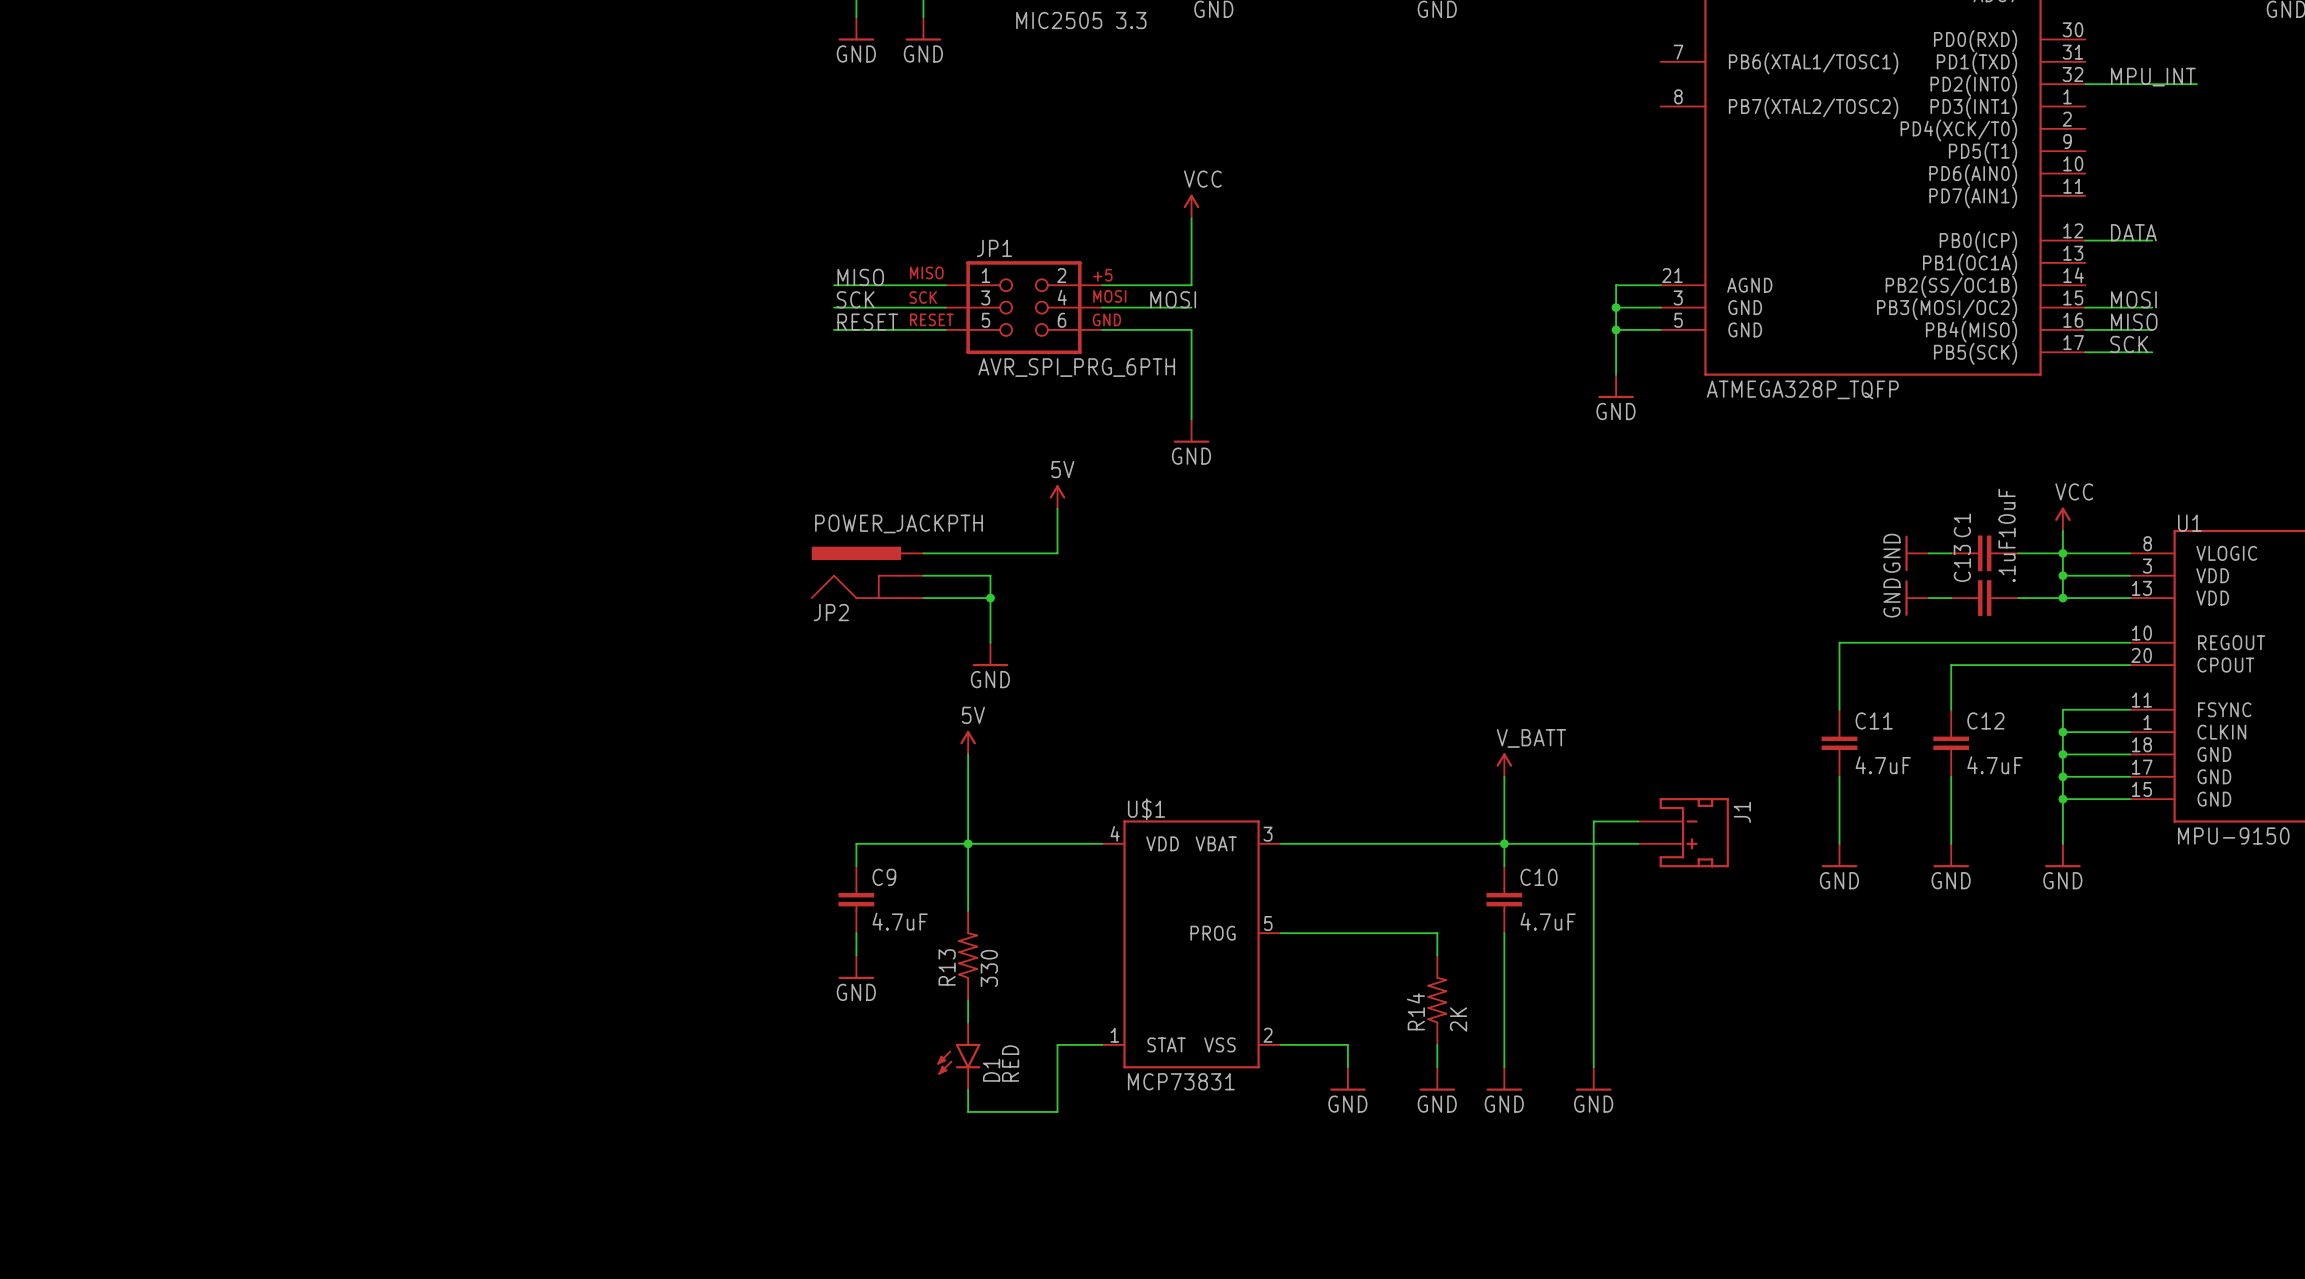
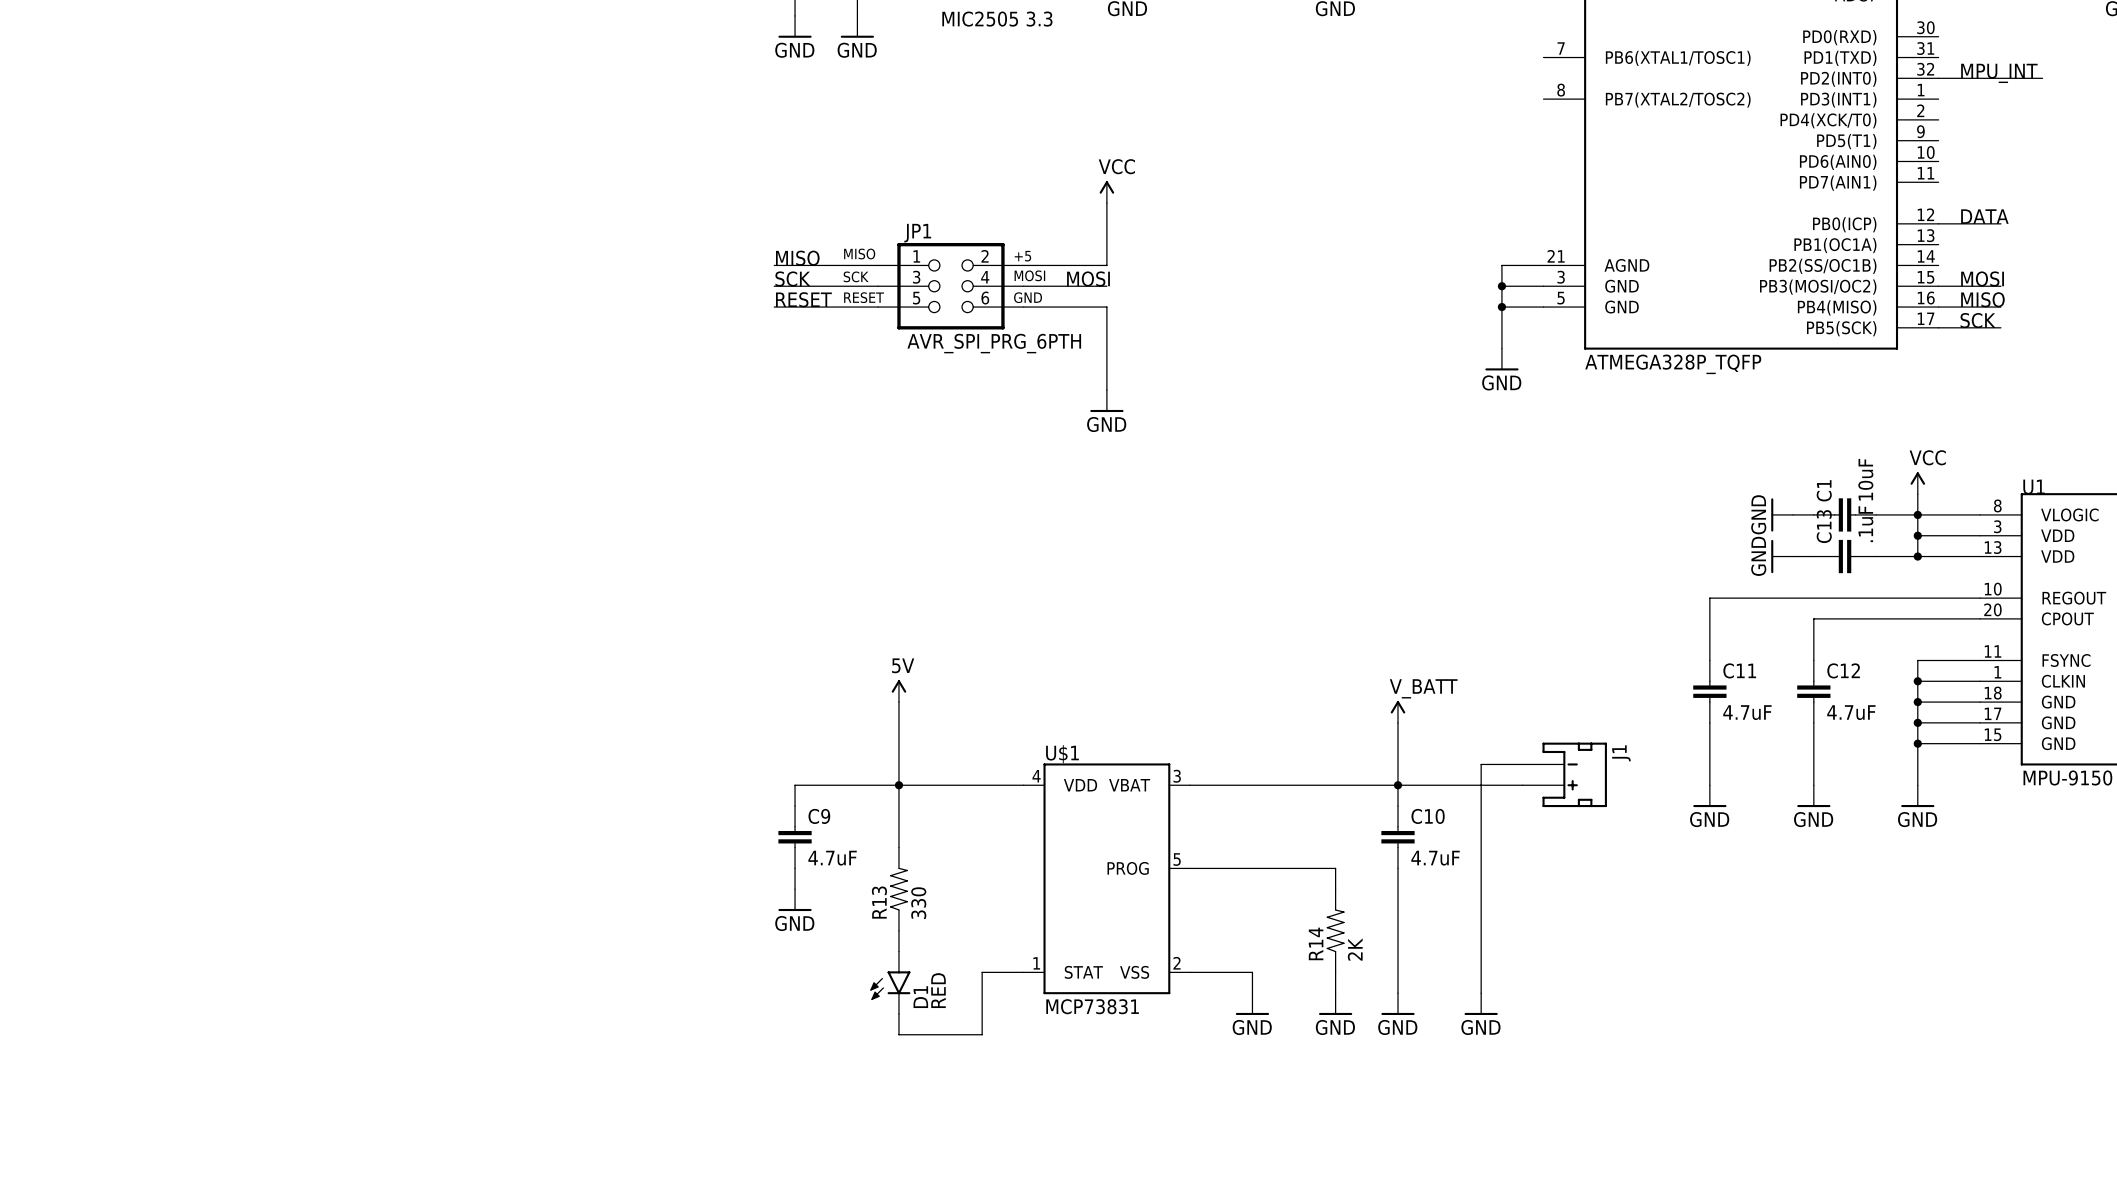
power symbol: 5V (1057, 496) -> none
wire: (1057, 508) (1057, 553) (923, 553) -> none
JP2: POWER_JACKPTH (867, 572) -> none
wire: (923, 575) (990, 575) (990, 642) -> none
wire: (923, 598) (990, 598) -> none
junction: (990, 598) -> none
power symbol: GND (990, 654) -> none

